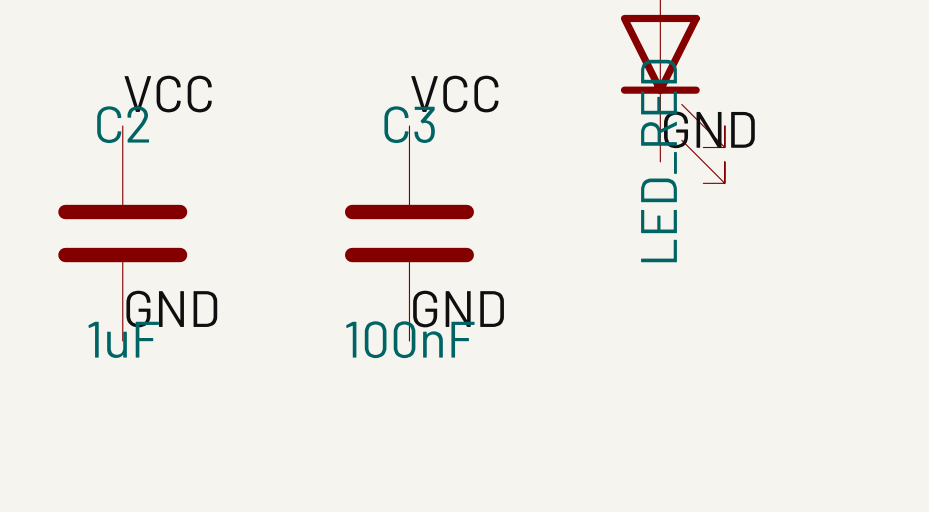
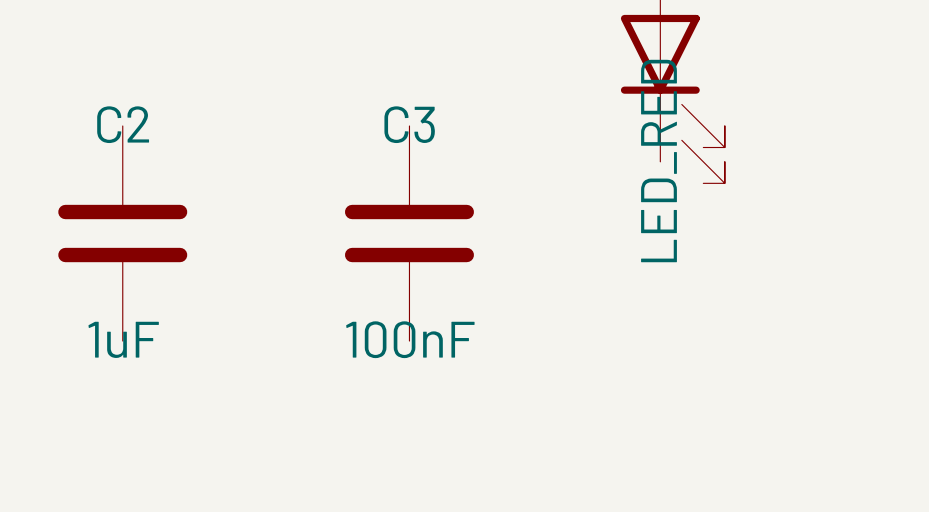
label: VCC (168, 94) -> none
label: VCC (454, 94) -> none
label: GND (709, 129) -> none
label: GND (171, 309) -> none
label: GND (458, 309) -> none

